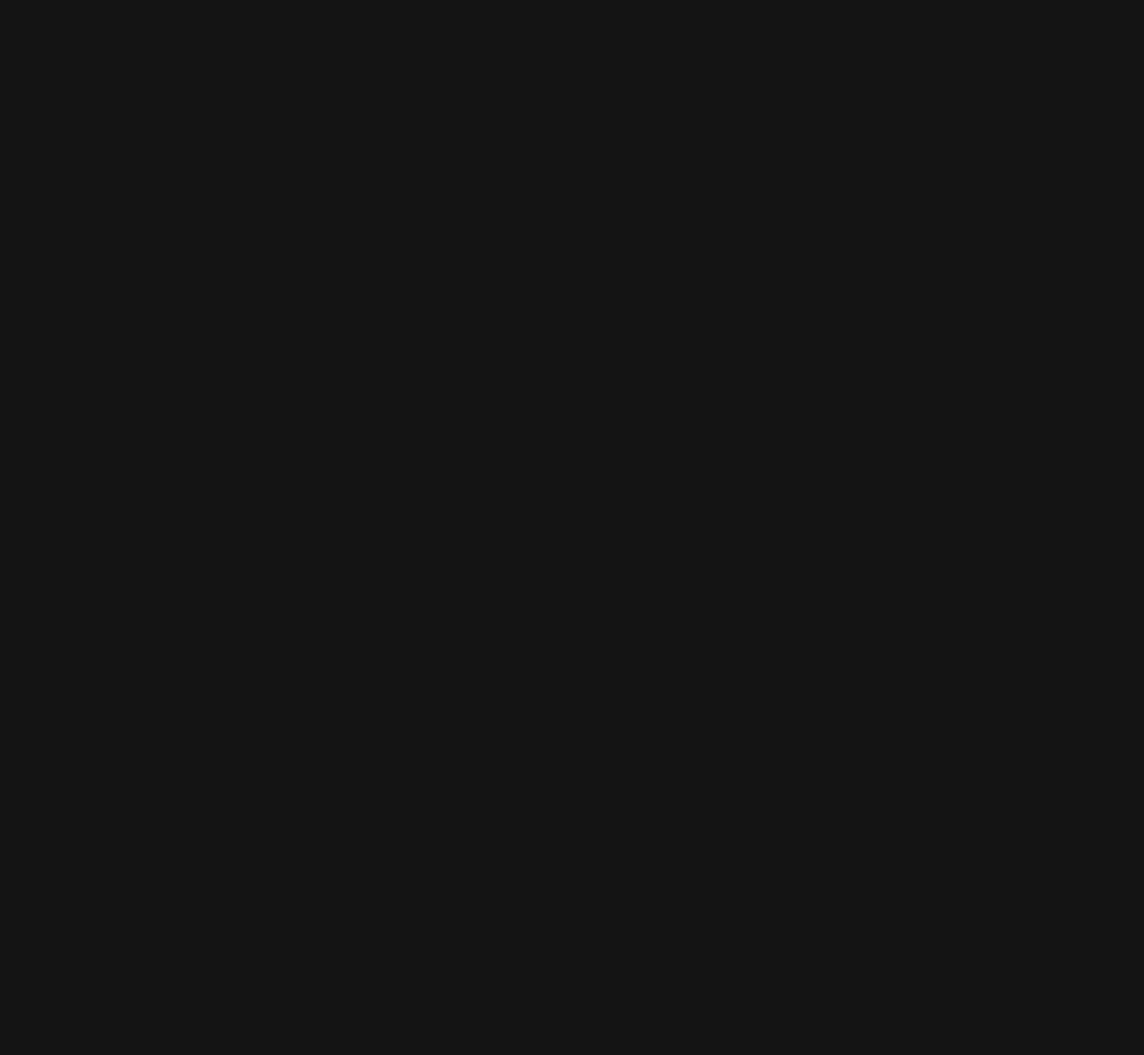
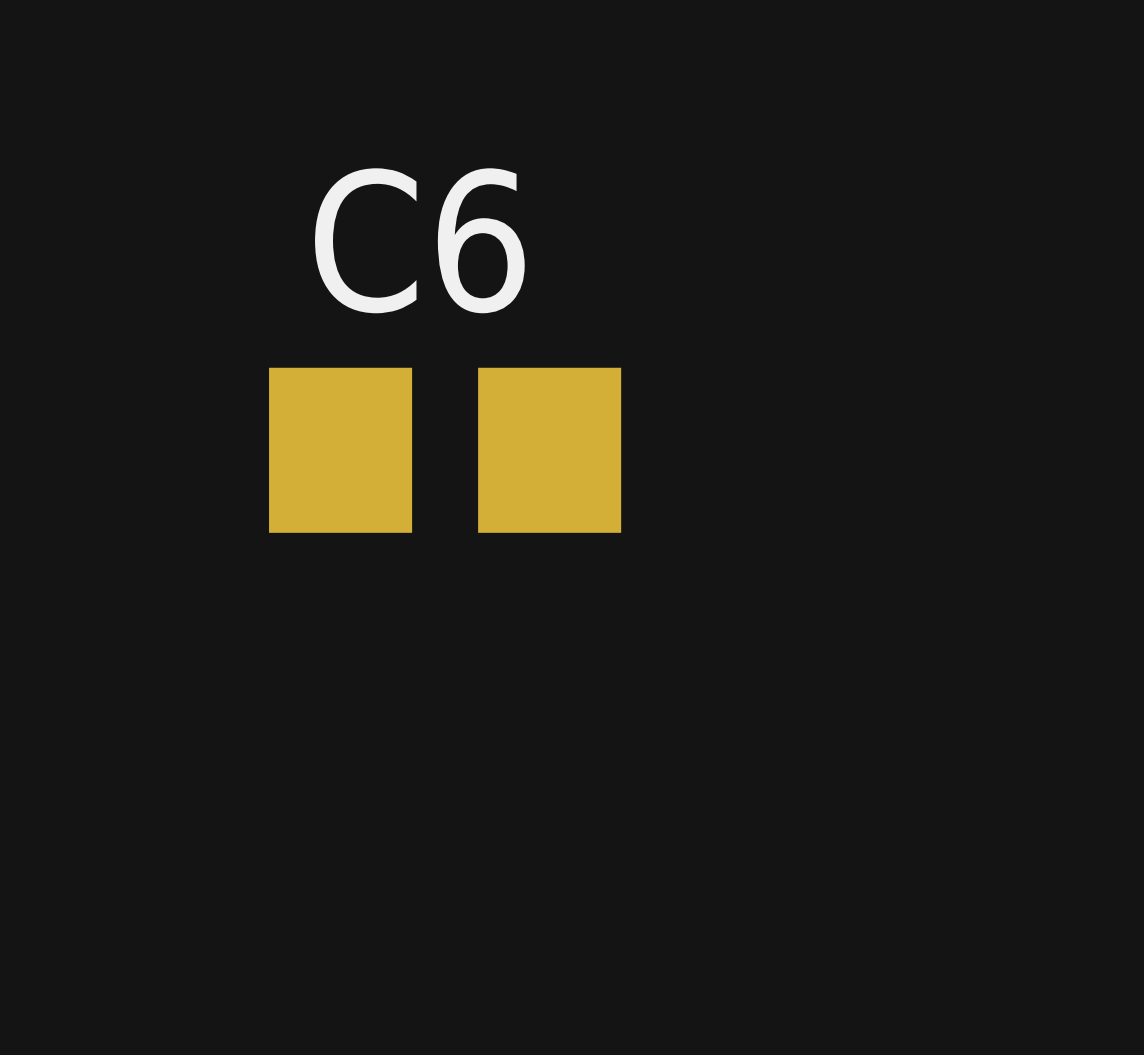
C6: none -> (445, 450)

